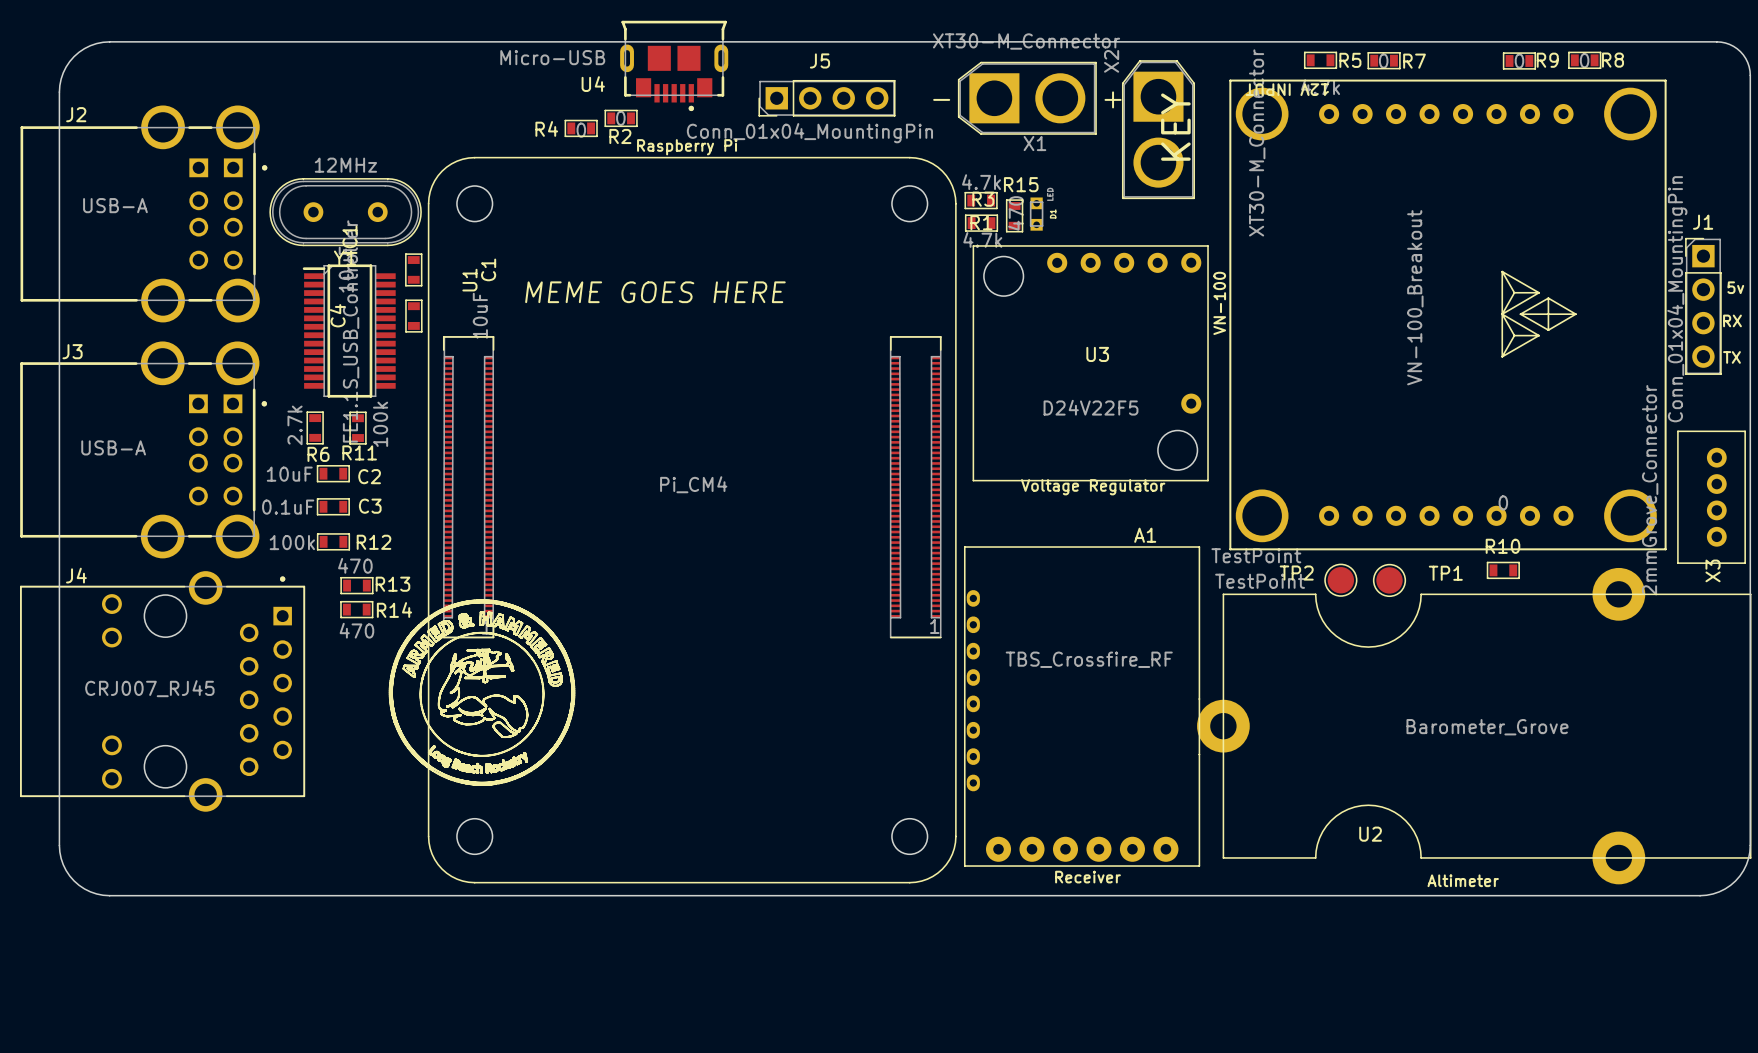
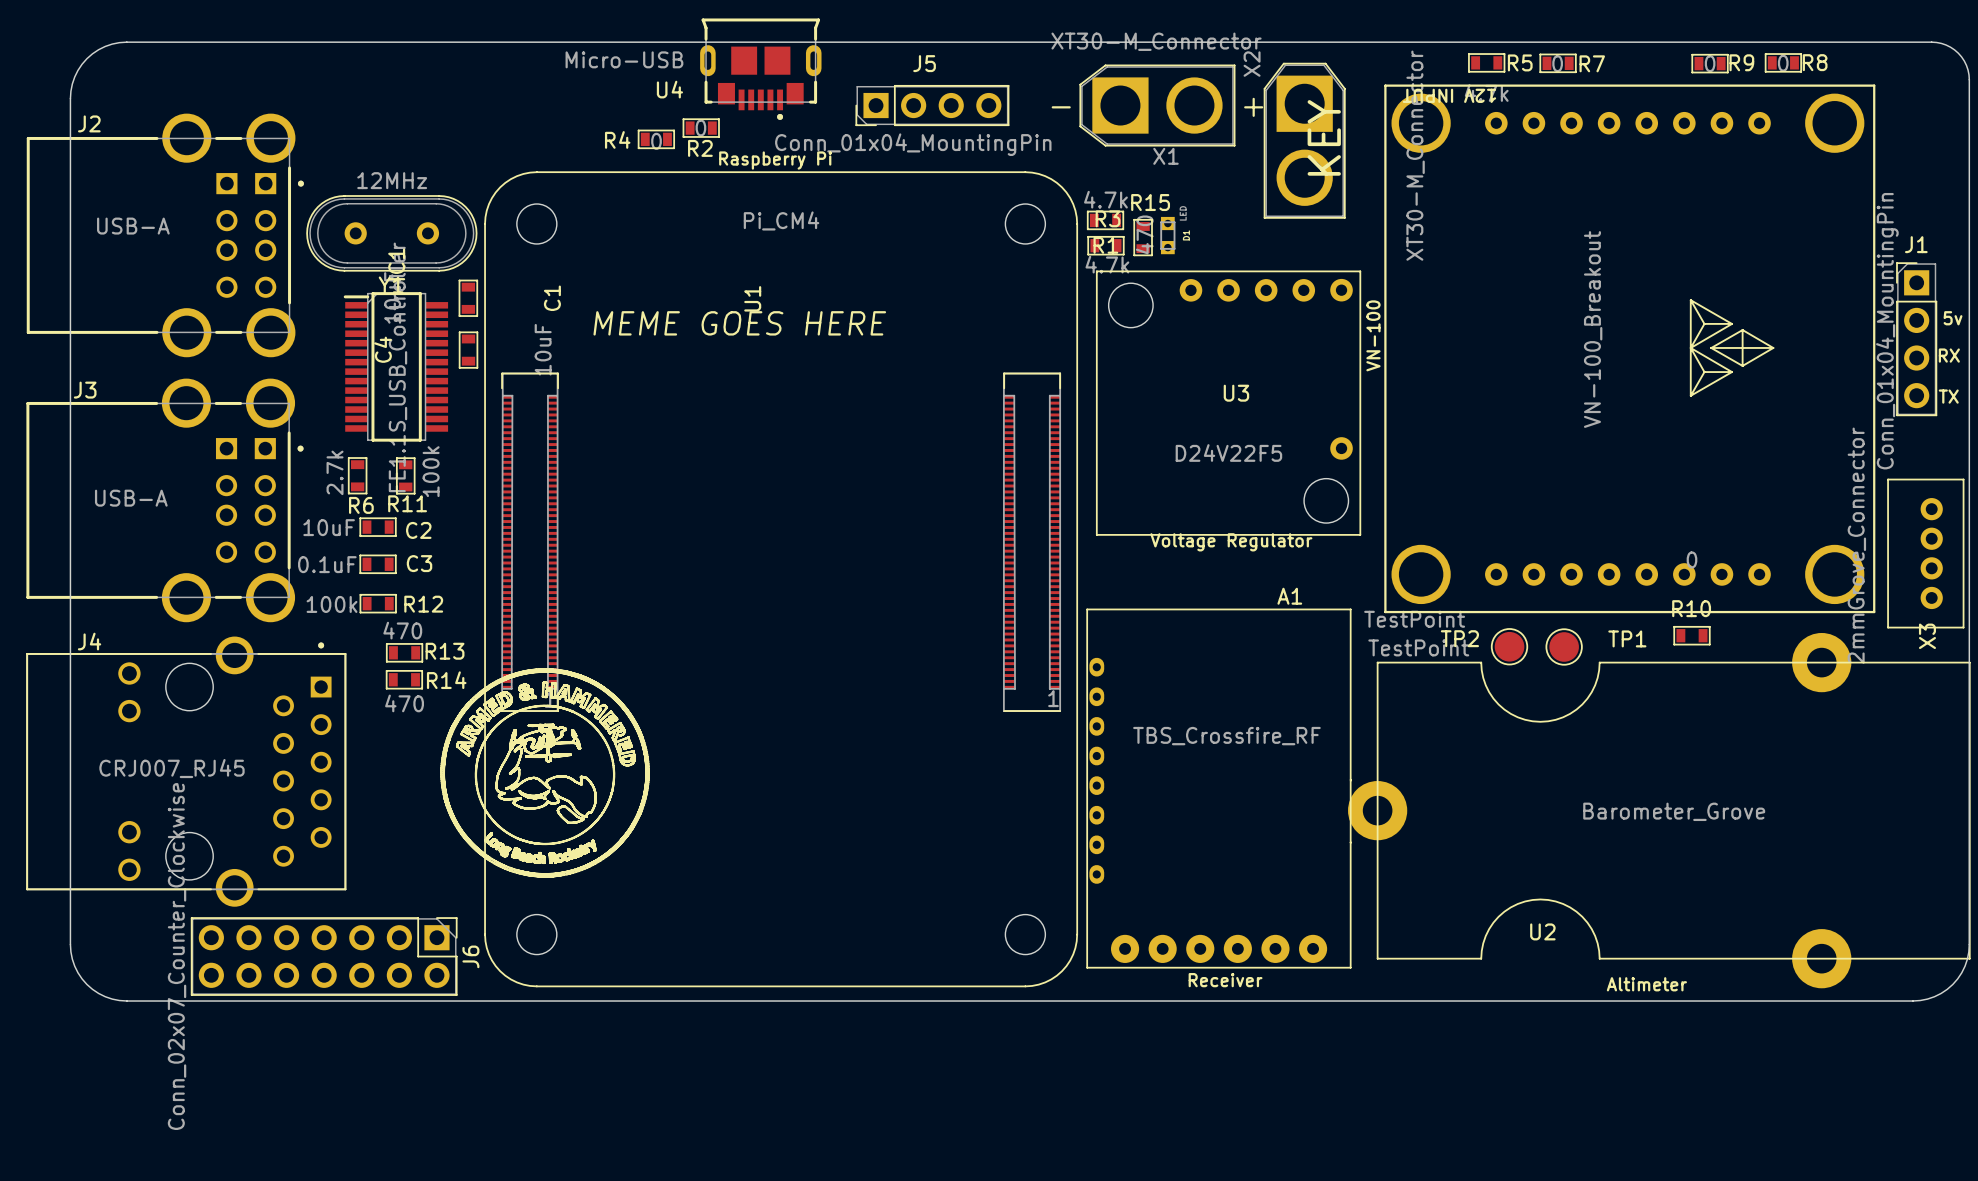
U1 name position: U1 (469, 280) -> U1 (752, 298)
U1 value position: Pi_CM4 (693, 484) -> Pi_CM4 (781, 220)
J6: none -> Conn_02x07_Counter_Clockwise (324, 956)

